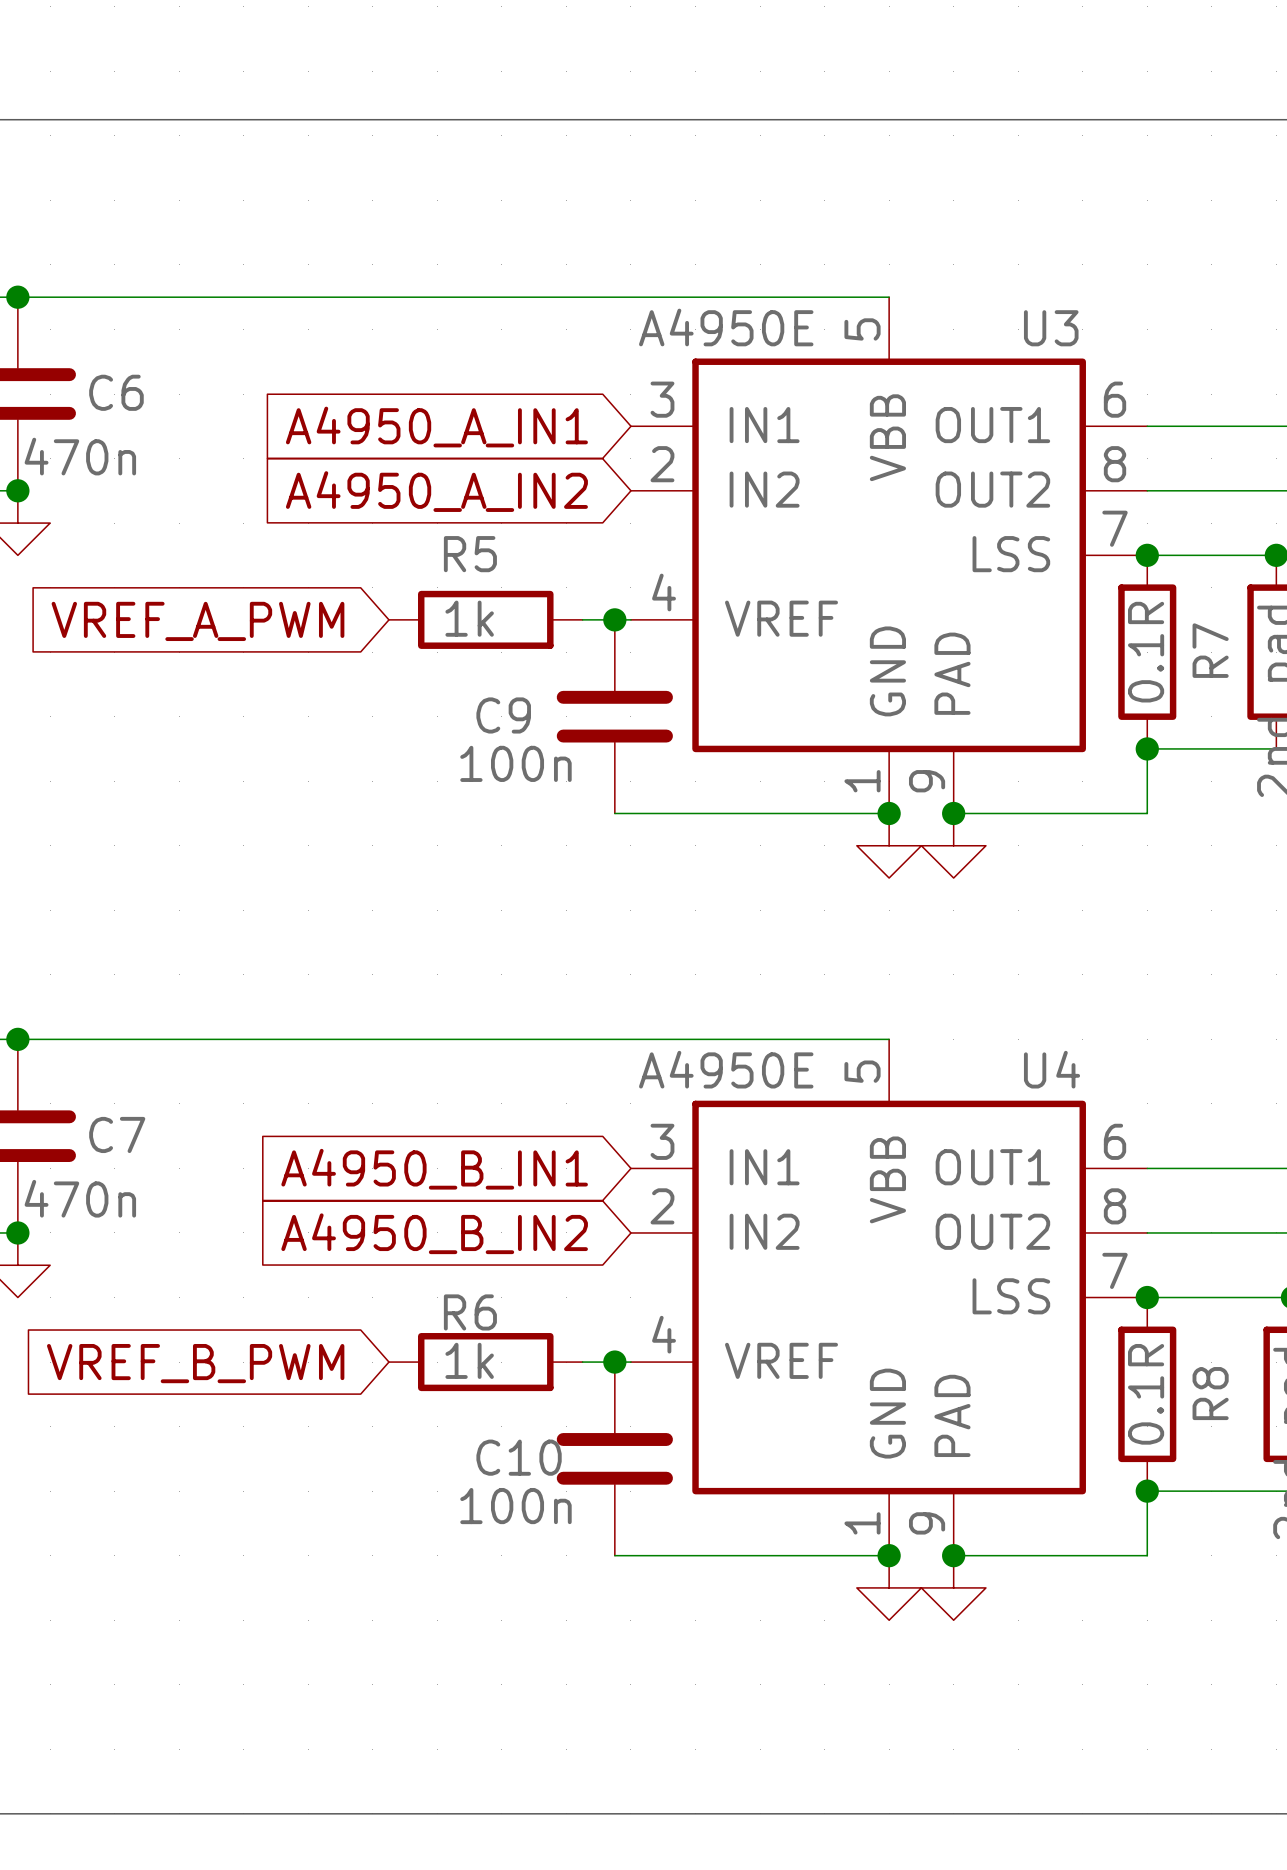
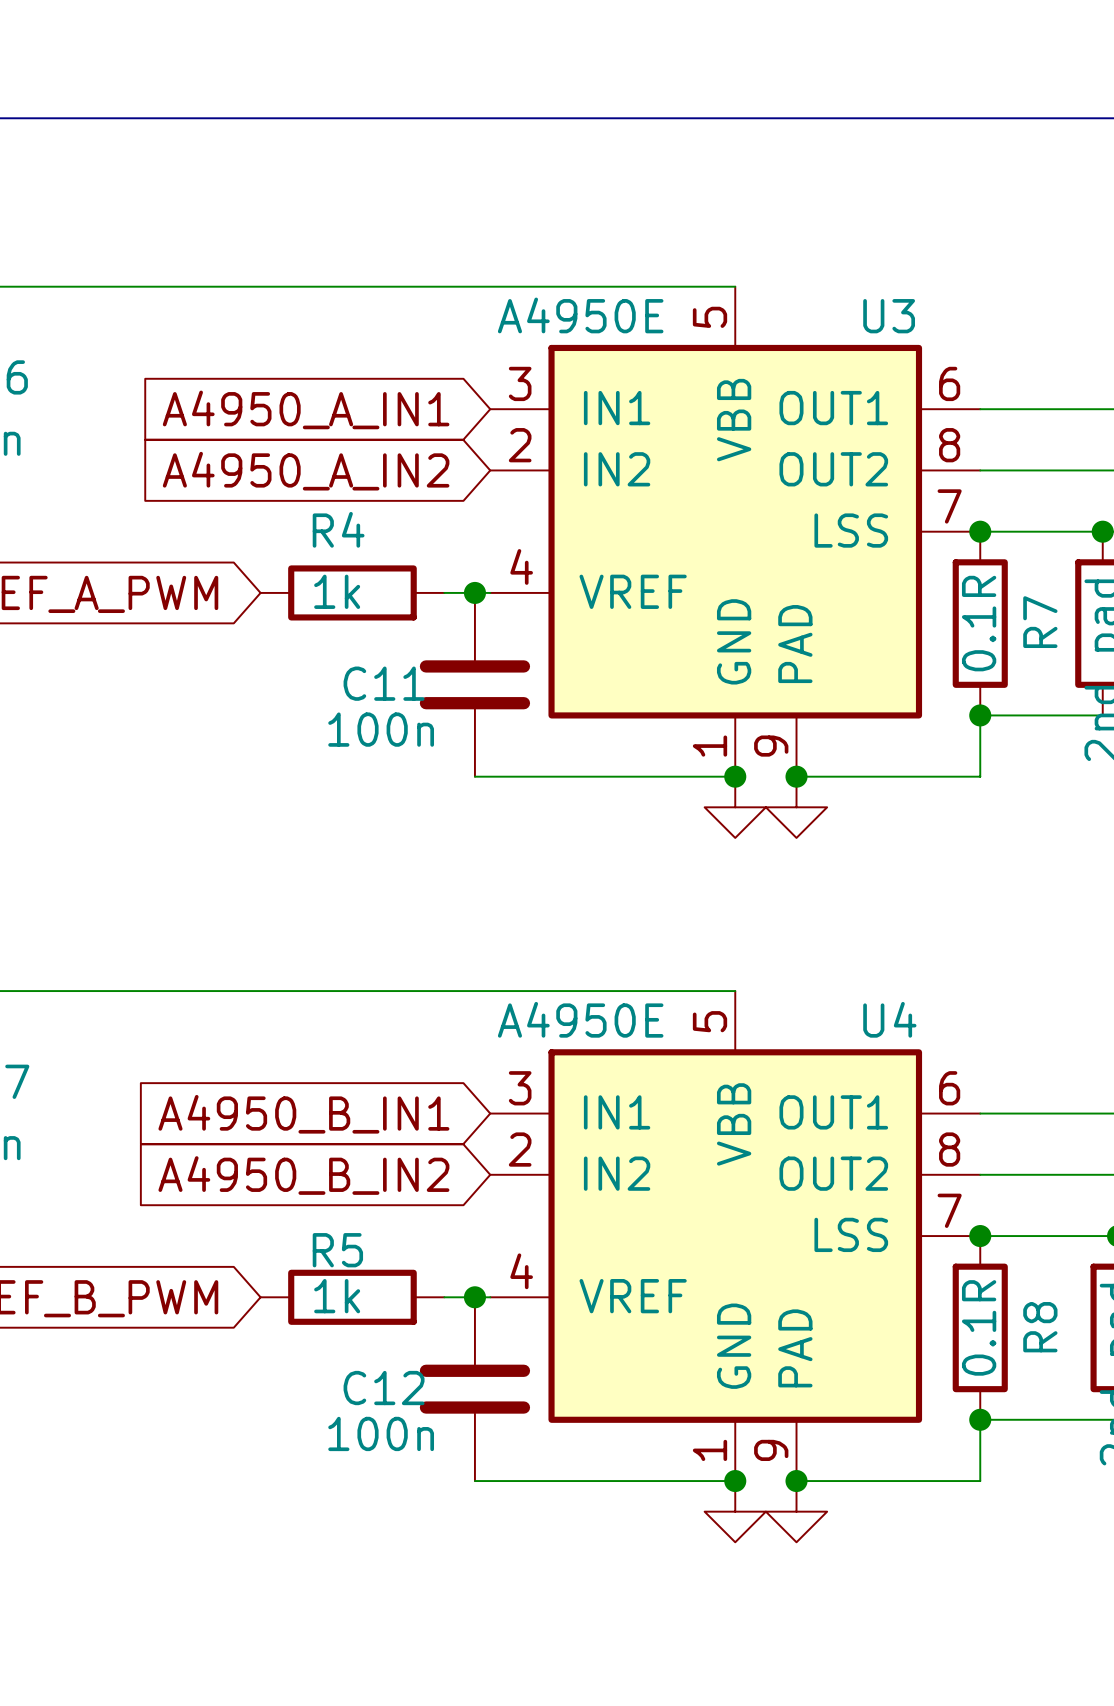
R5 name: R5 (470, 554) -> R4 (338, 529)
C9 name: C9 (503, 715) -> C11 (384, 683)
R6 name: R6 (470, 1312) -> R5 (337, 1250)
C10 name: C10 (519, 1457) -> C12 (384, 1388)

